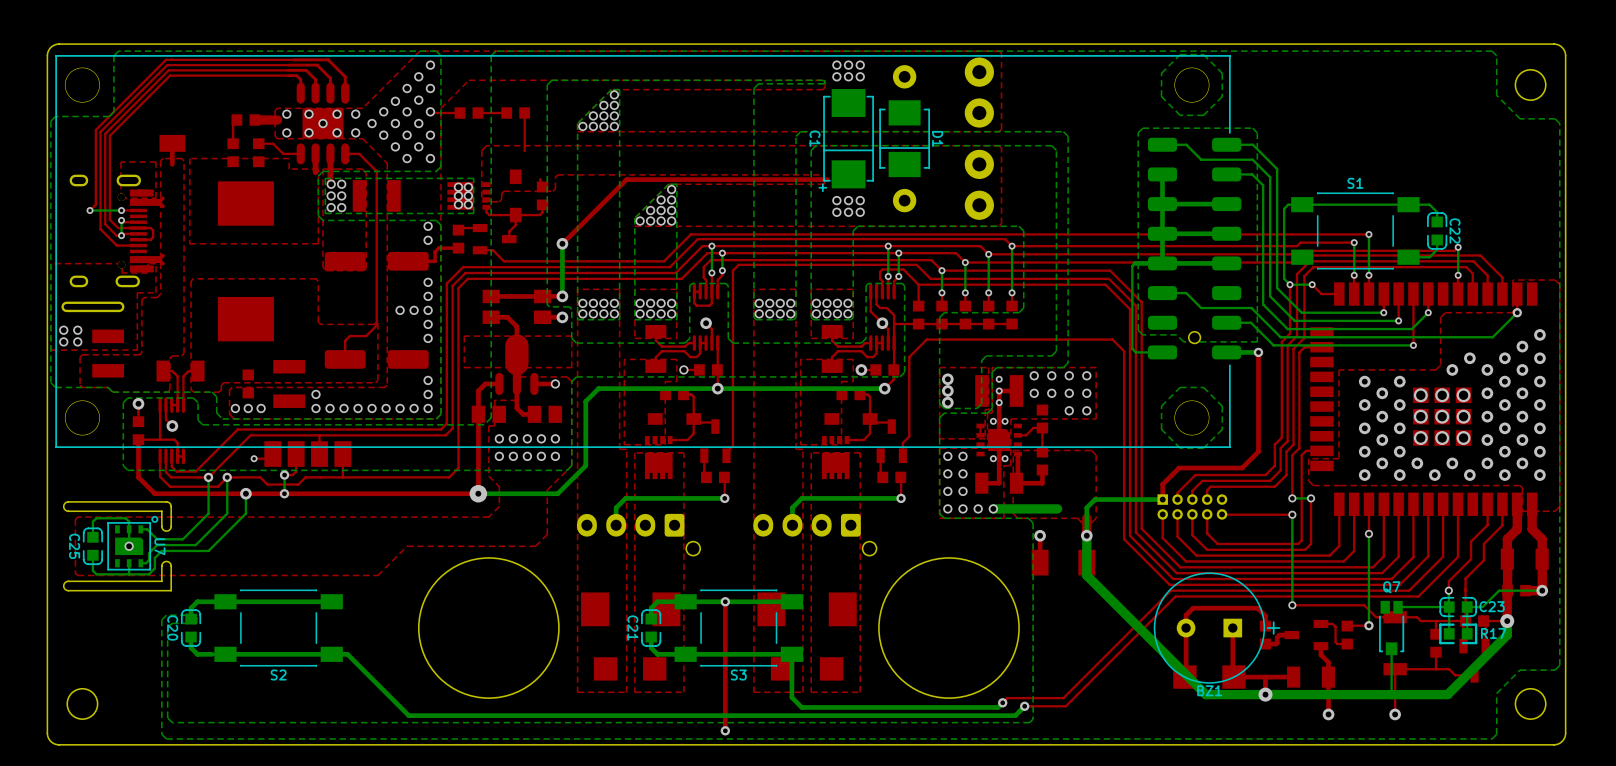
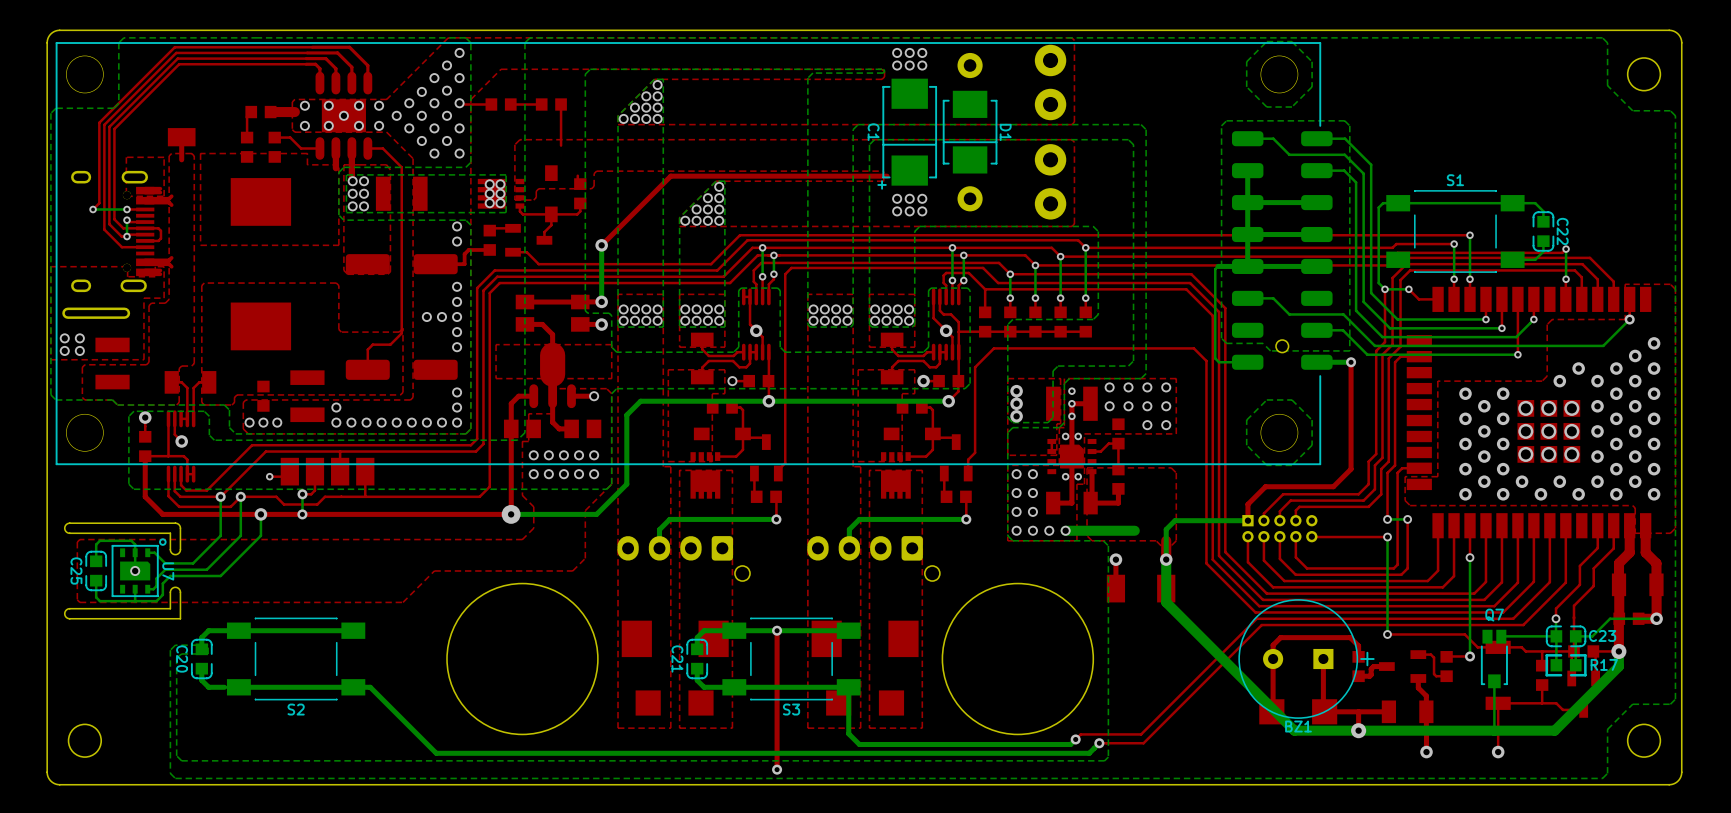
top track: none -> (750, 296) (750, 324) (756, 330)
top track: (711, 291) (711, 303) (709, 305) (696, 305) (694, 303) (694, 291) -> none

